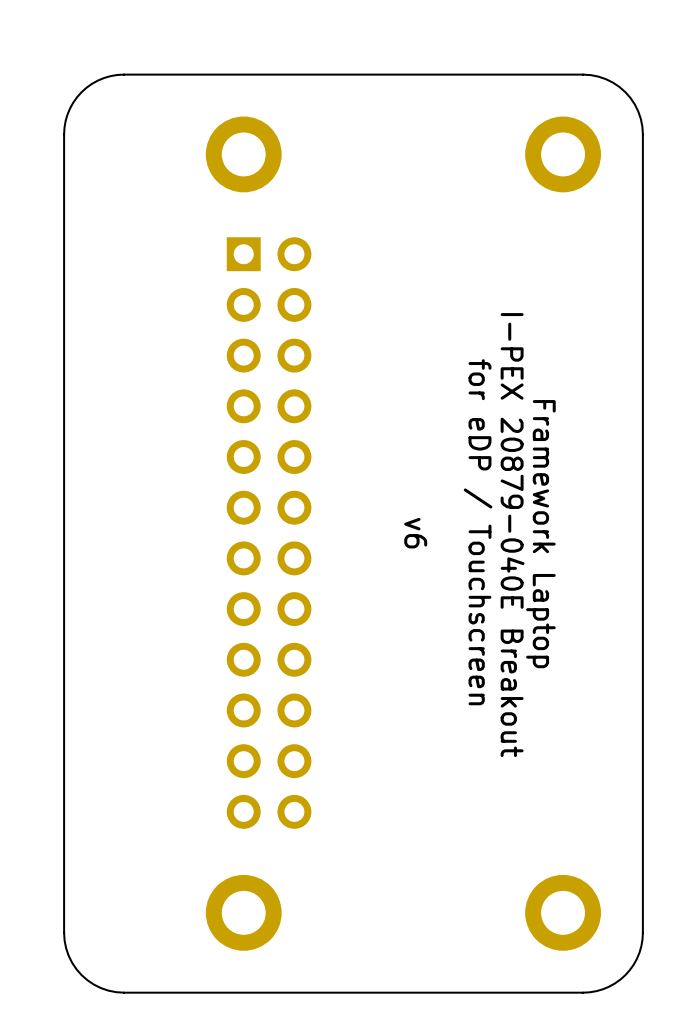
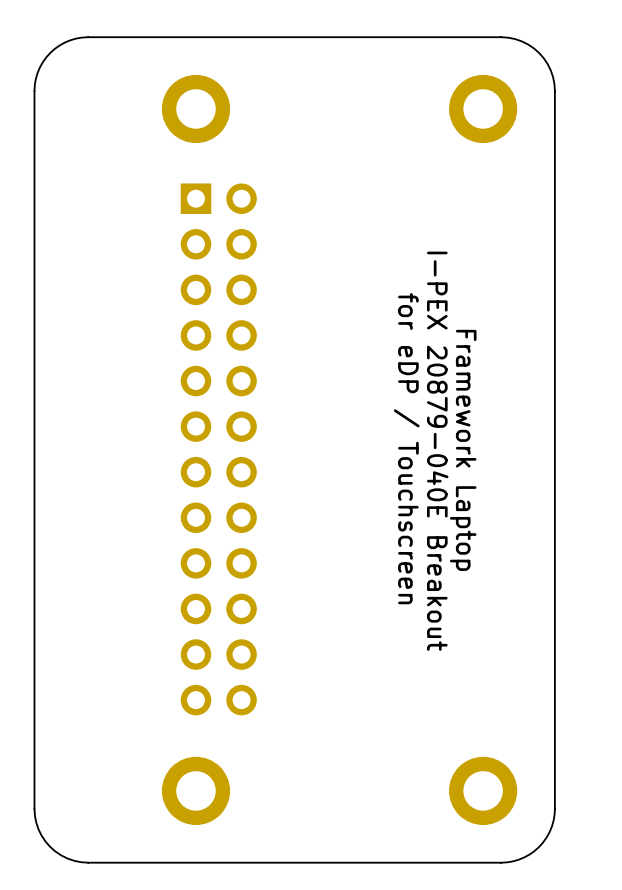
text: v6 (415, 533) -> none

